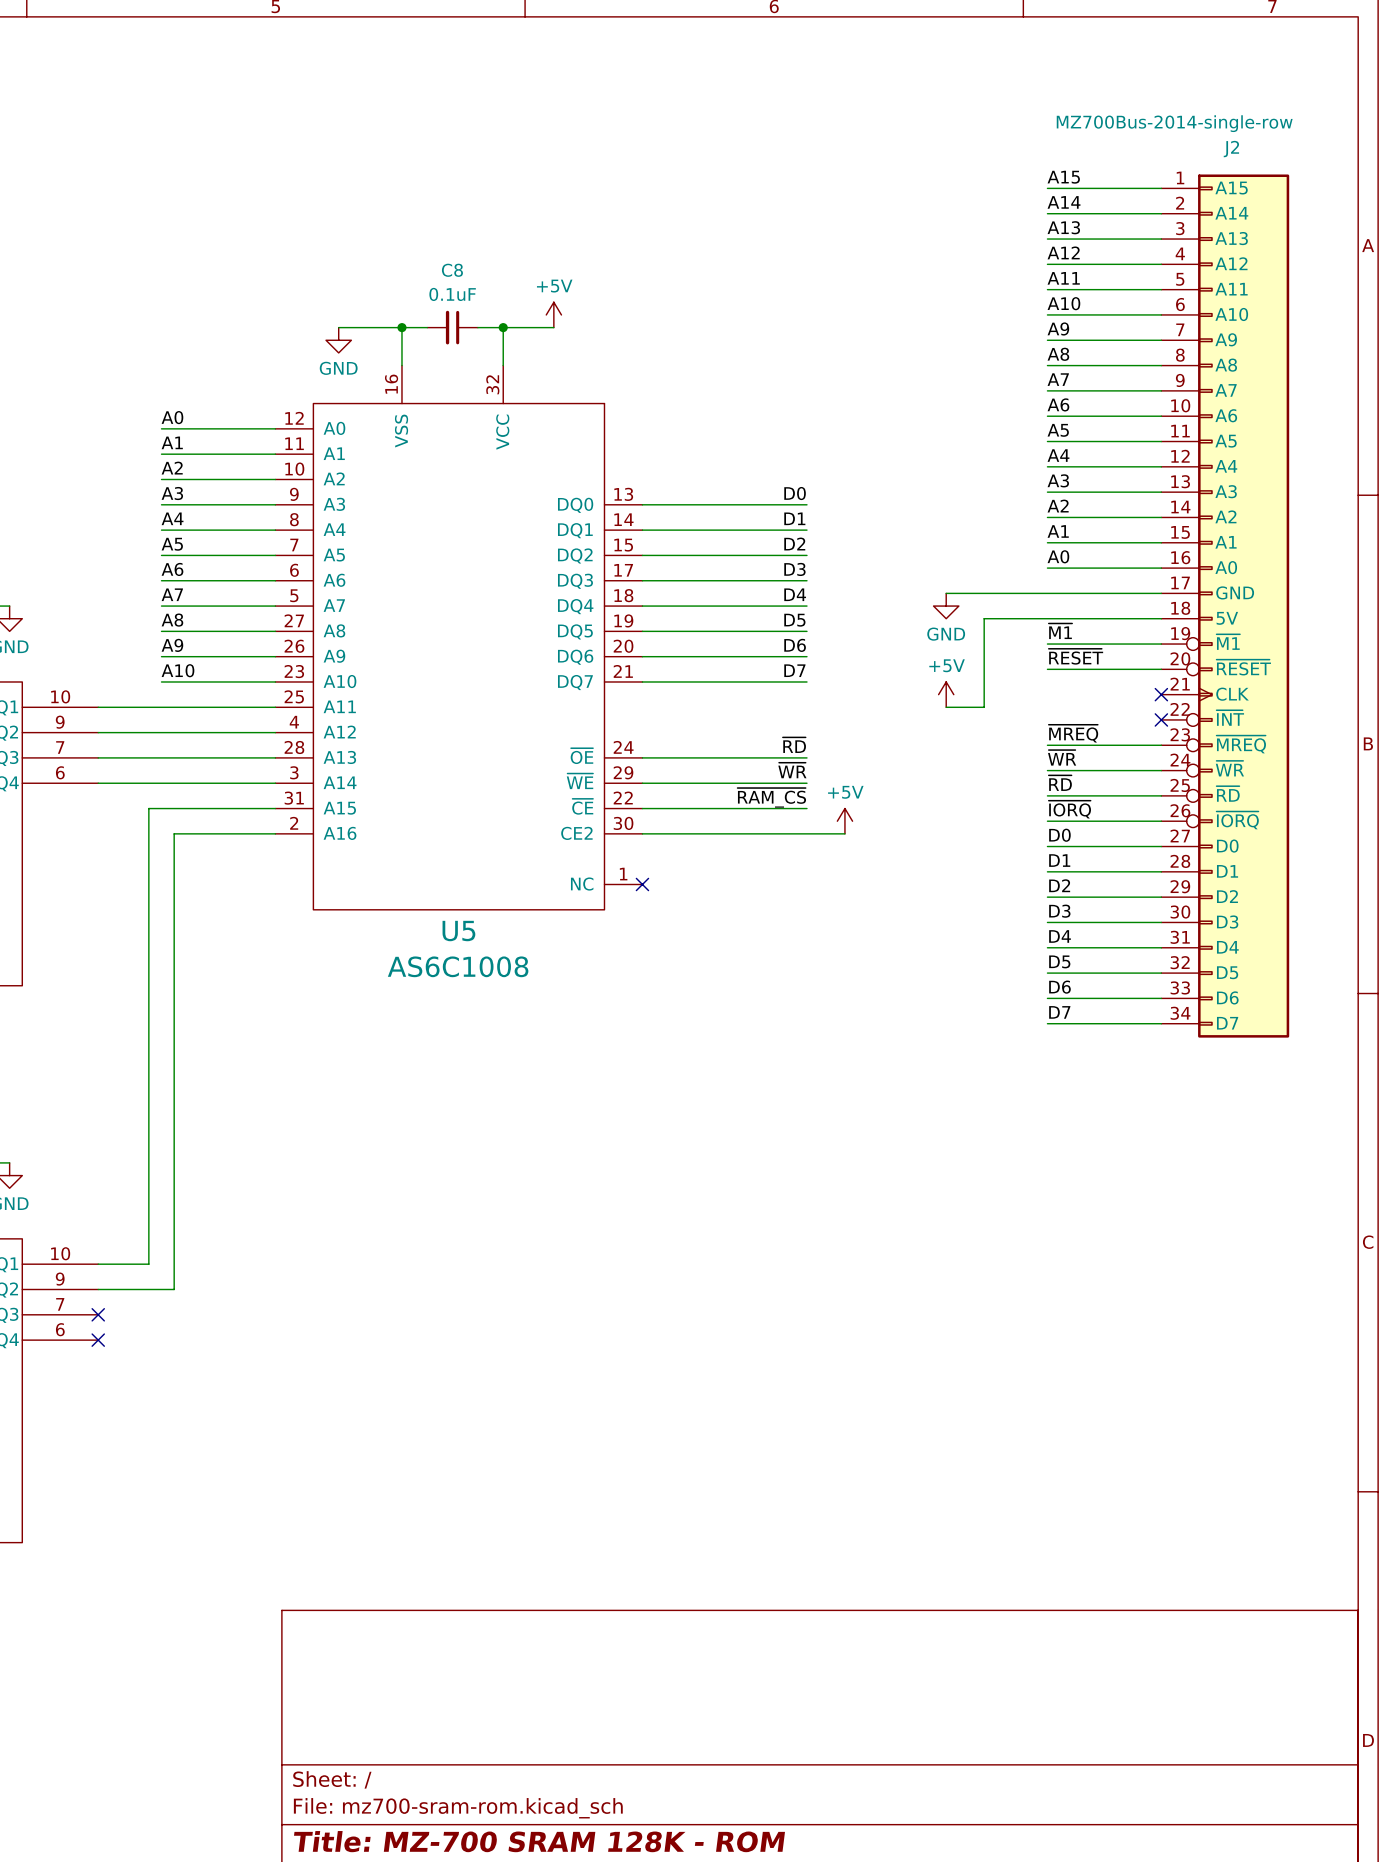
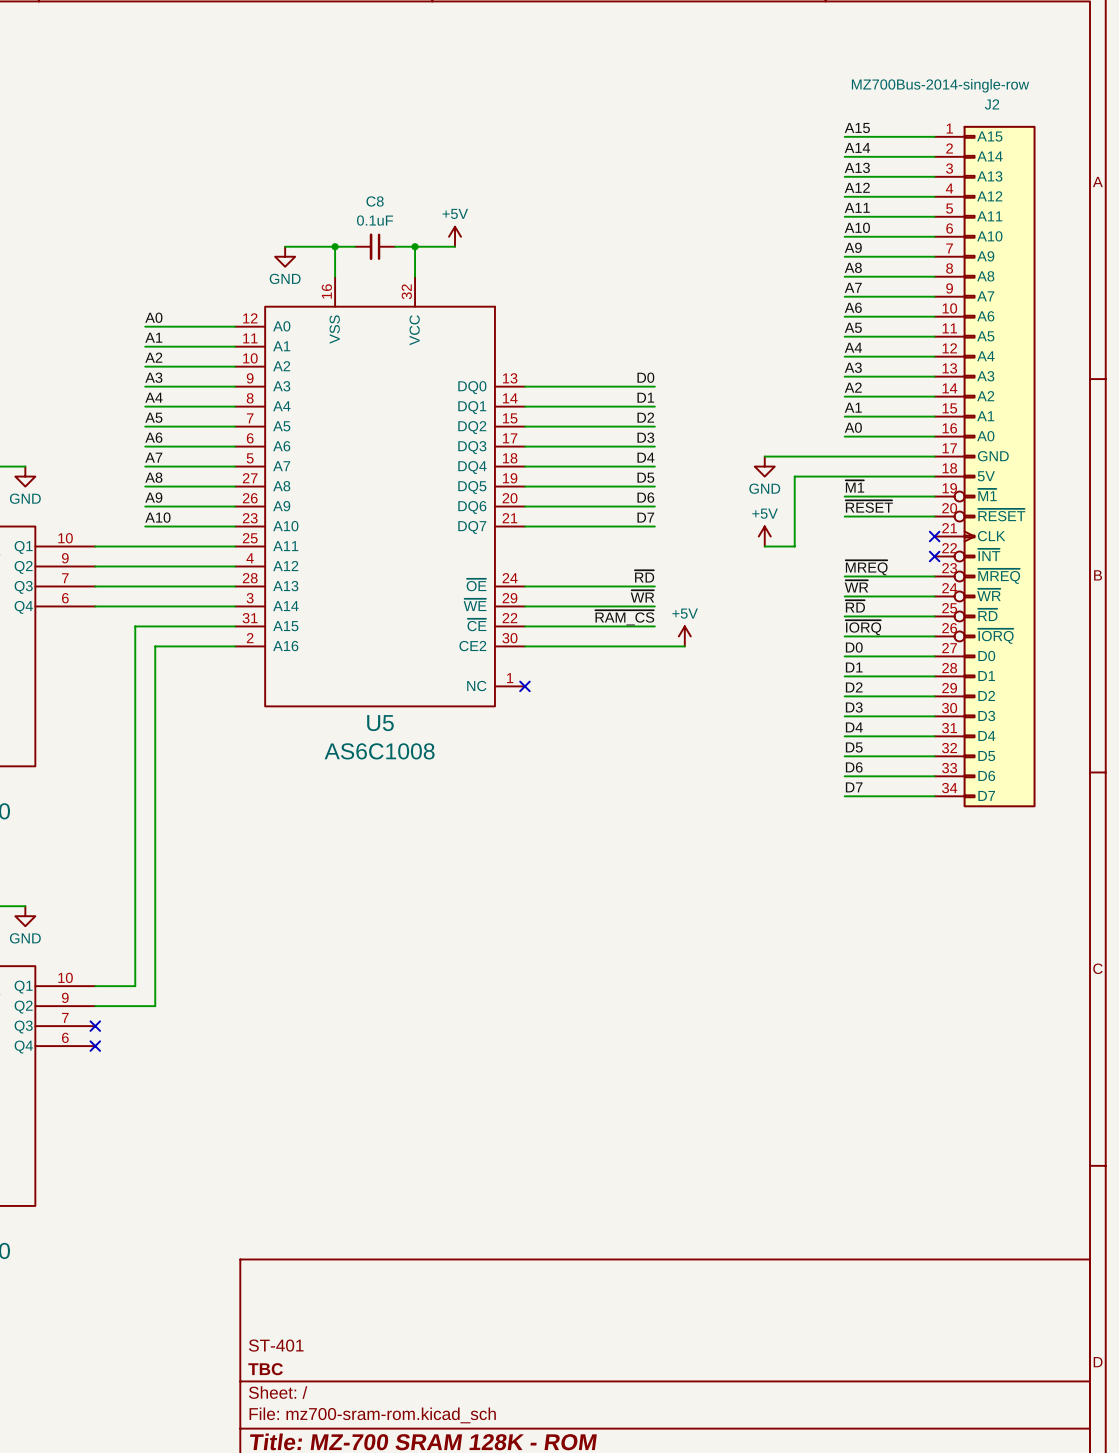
title block: none -> ST-401 (276, 1345)
title block: none -> TBC (265, 1369)

